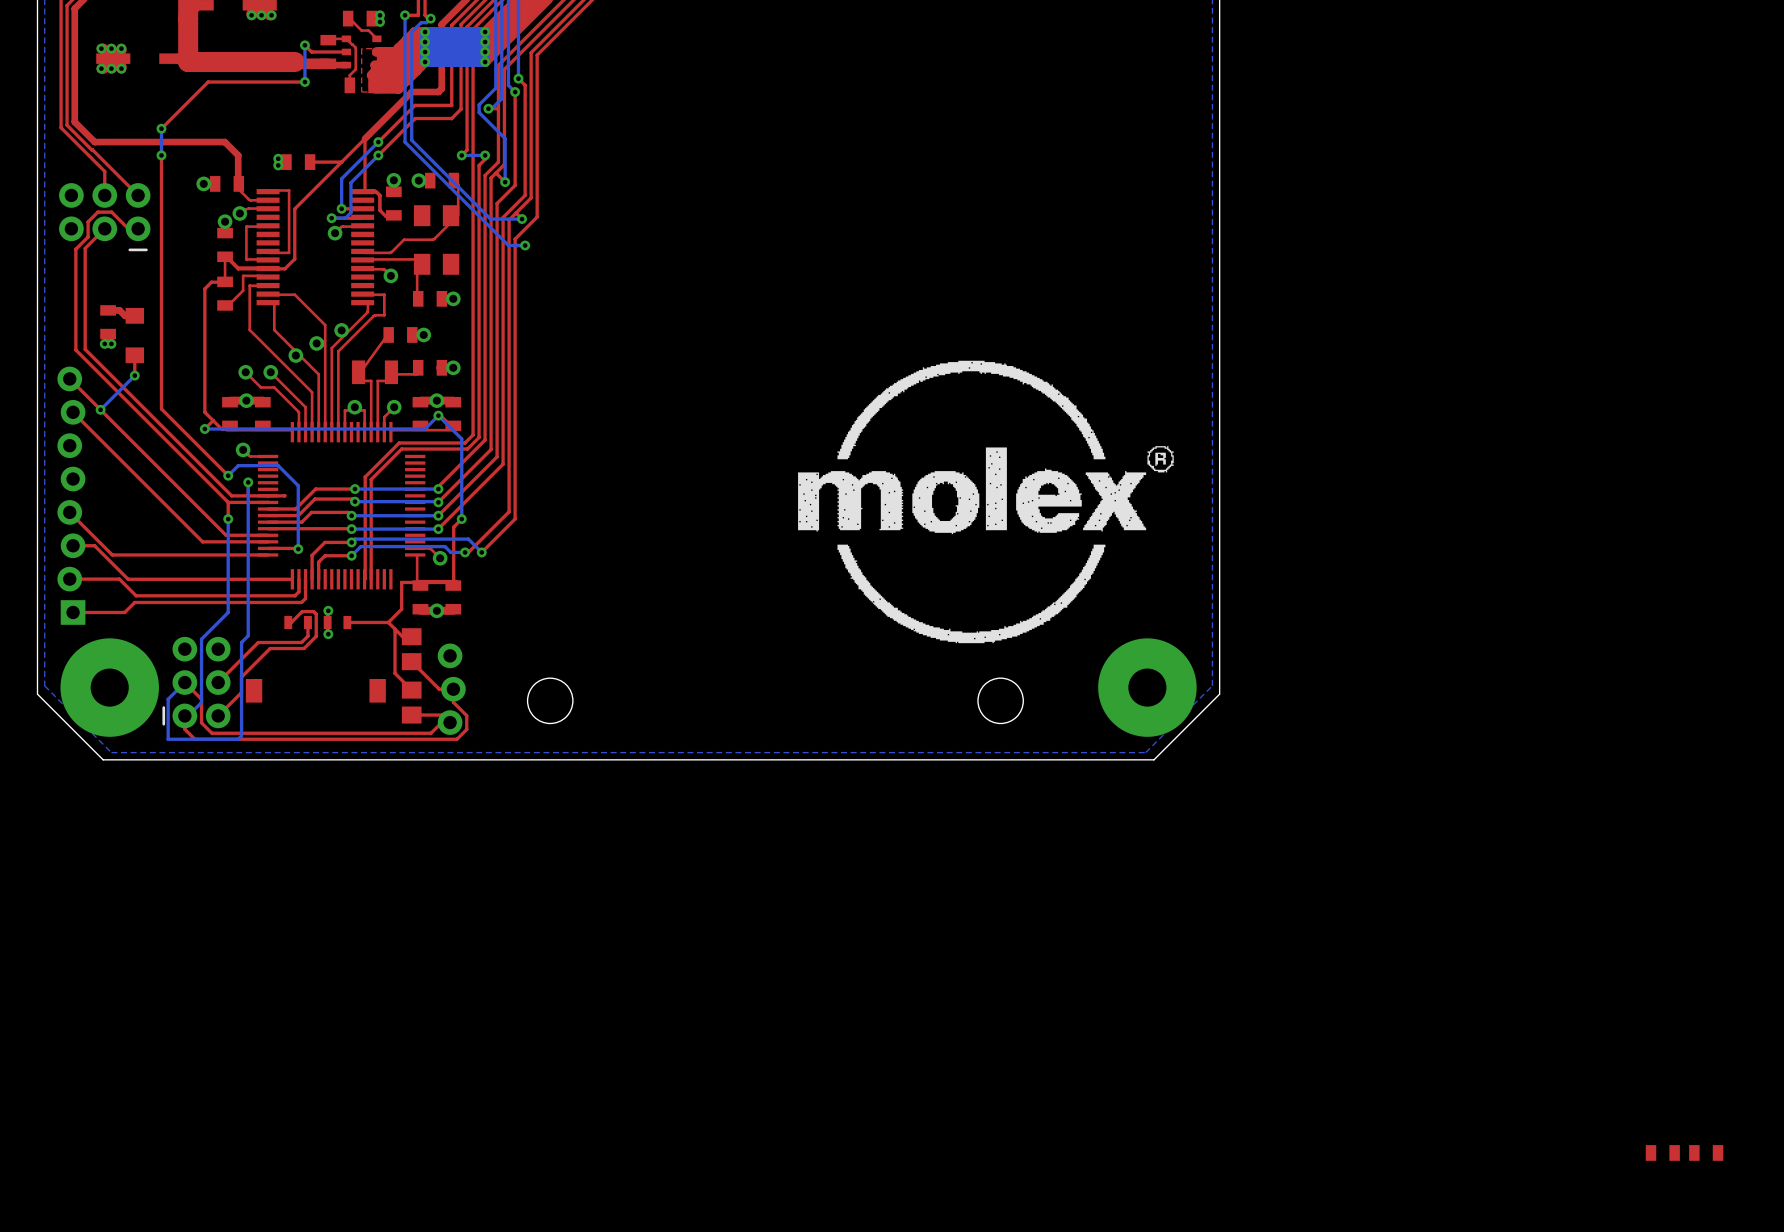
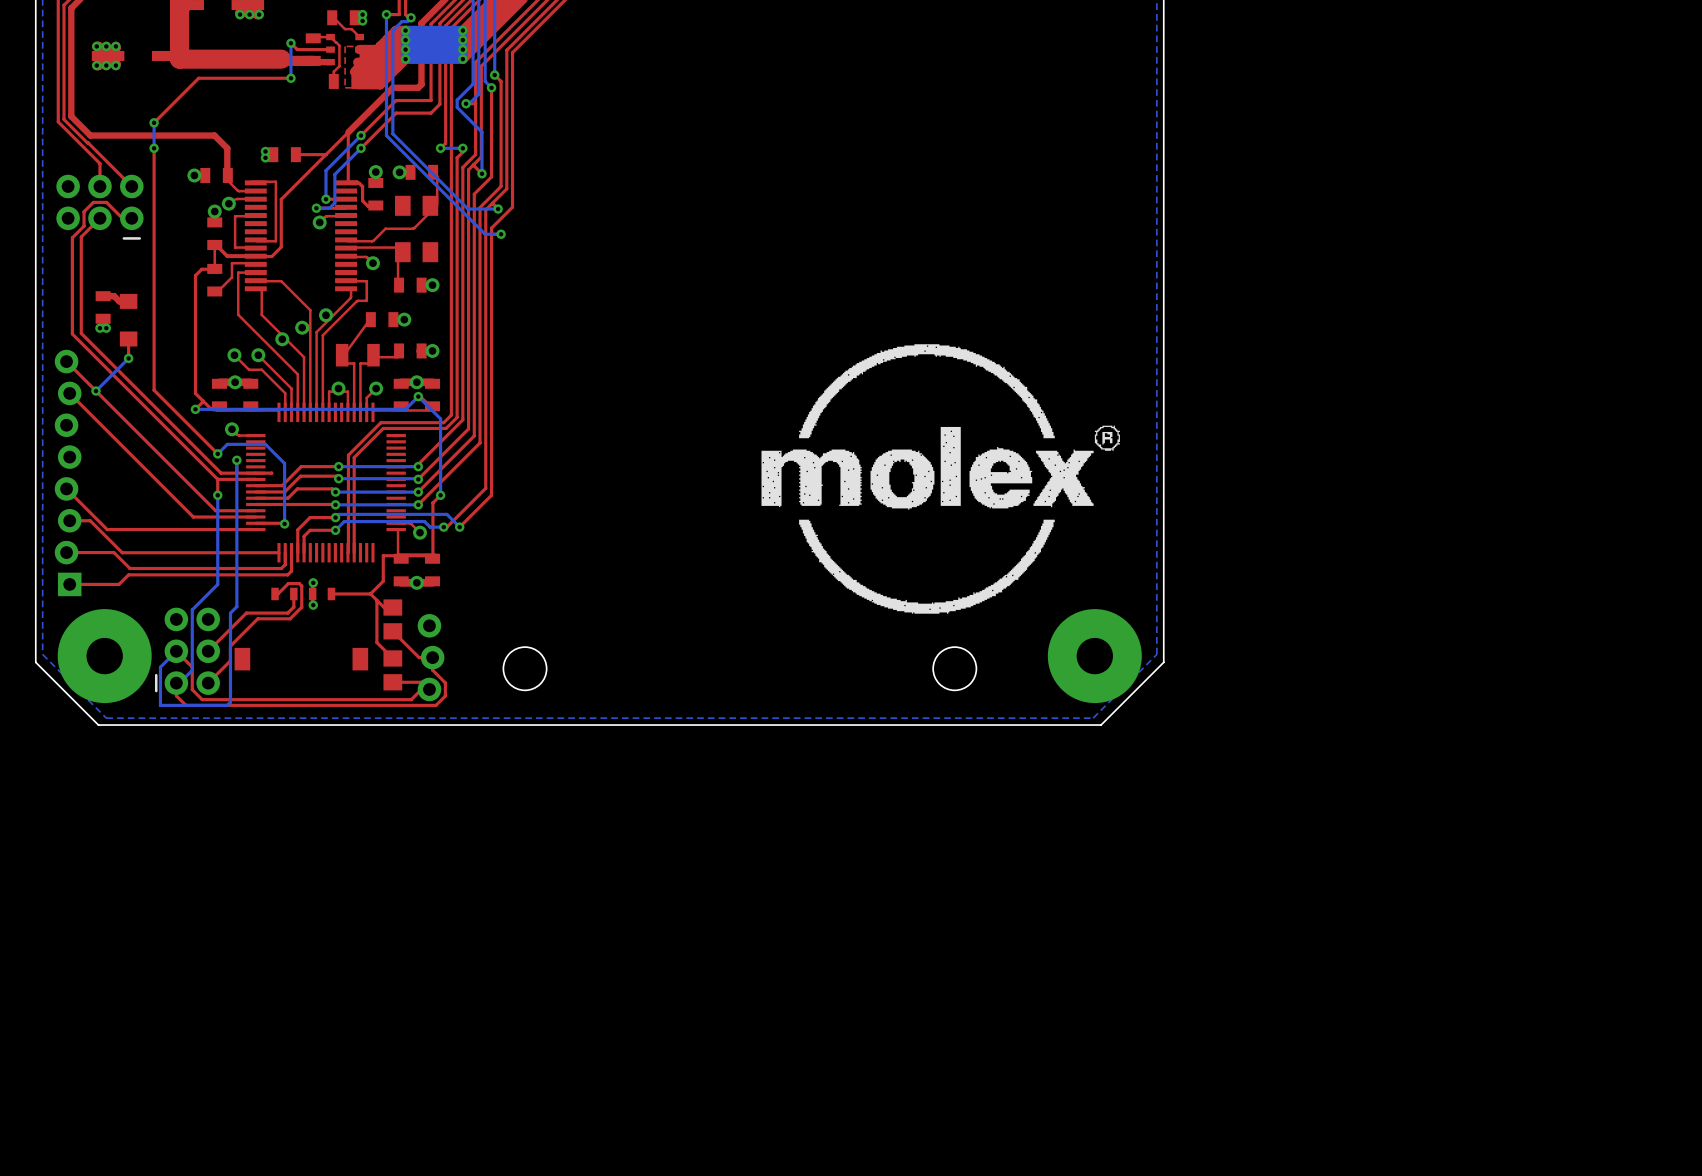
part: (1662, 1152) -> none
part: (1706, 1152) -> none

